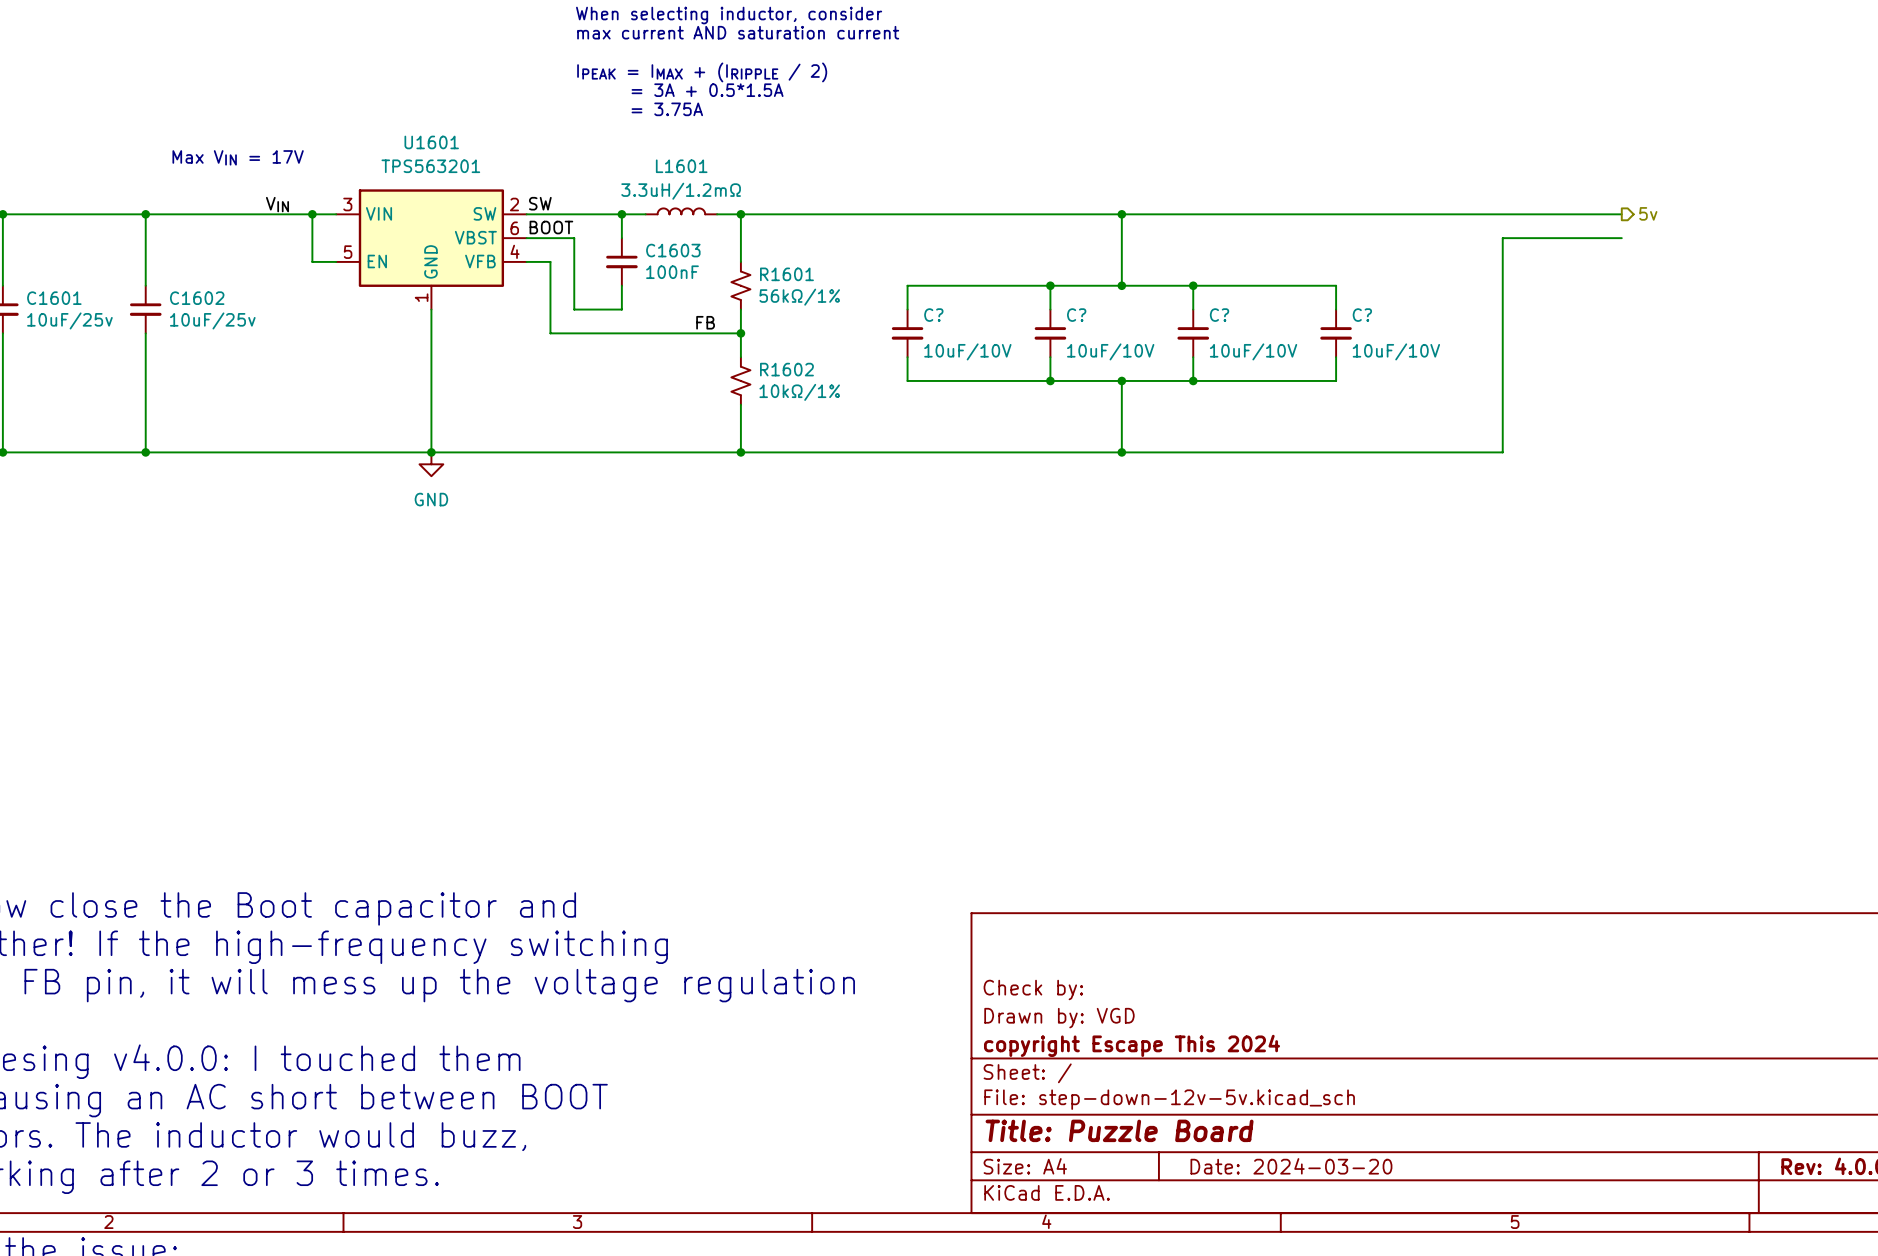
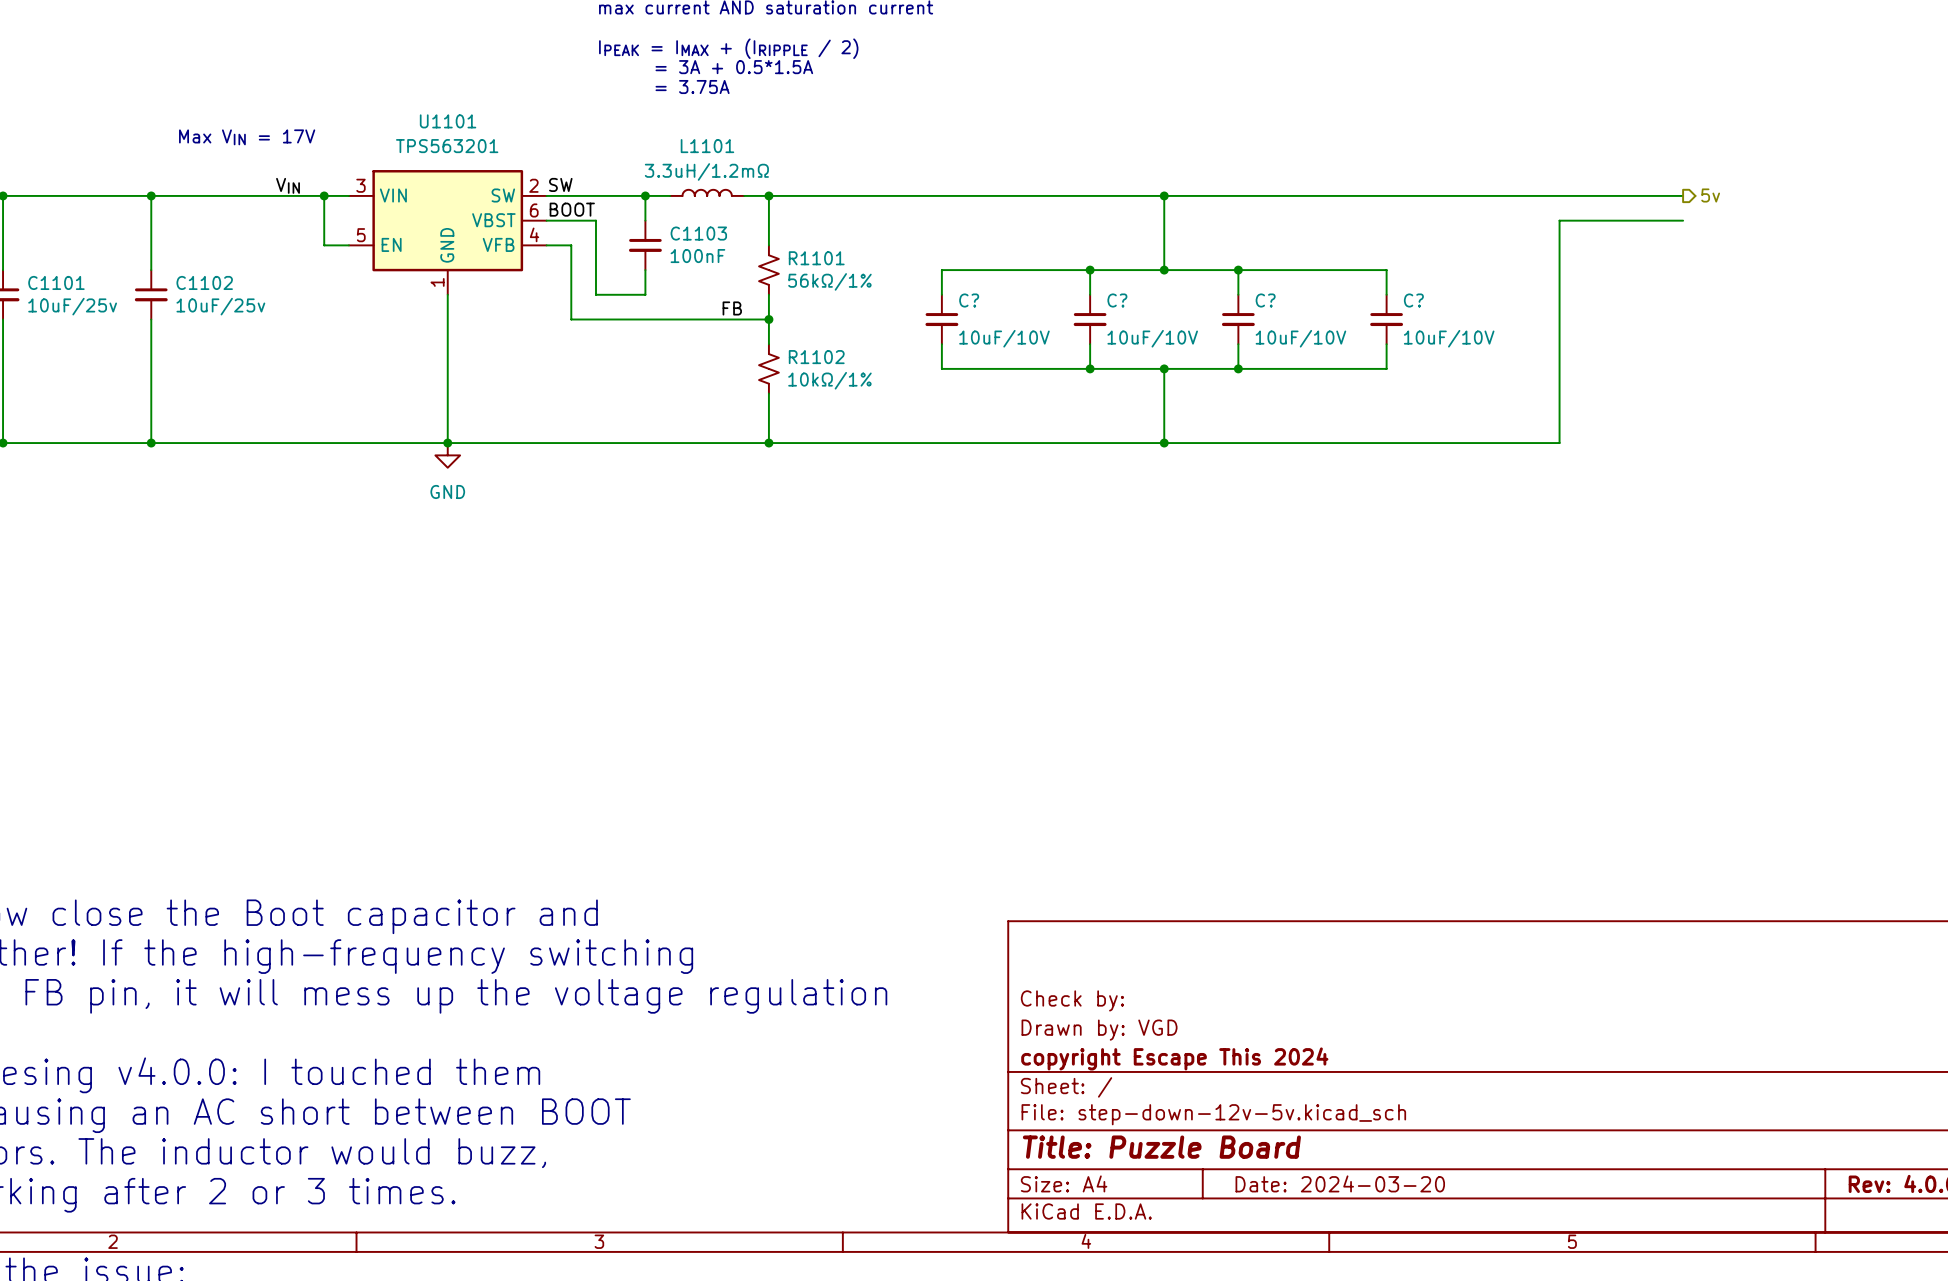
U1601 name: U1601 (431, 142) -> U1101 (448, 121)
L1601 name: L1601 (681, 166) -> L1101 (707, 146)
C1603 name: C1603 (673, 250) -> C1103 (698, 233)
R1601 name: R1601 (786, 274) -> R1101 (816, 258)
C1601 name: C1601 (54, 298) -> C1101 (56, 282)
C1602 name: C1602 (197, 298) -> C1102 (204, 282)
R1602 name: R1602 (786, 369) -> R1102 (816, 357)

